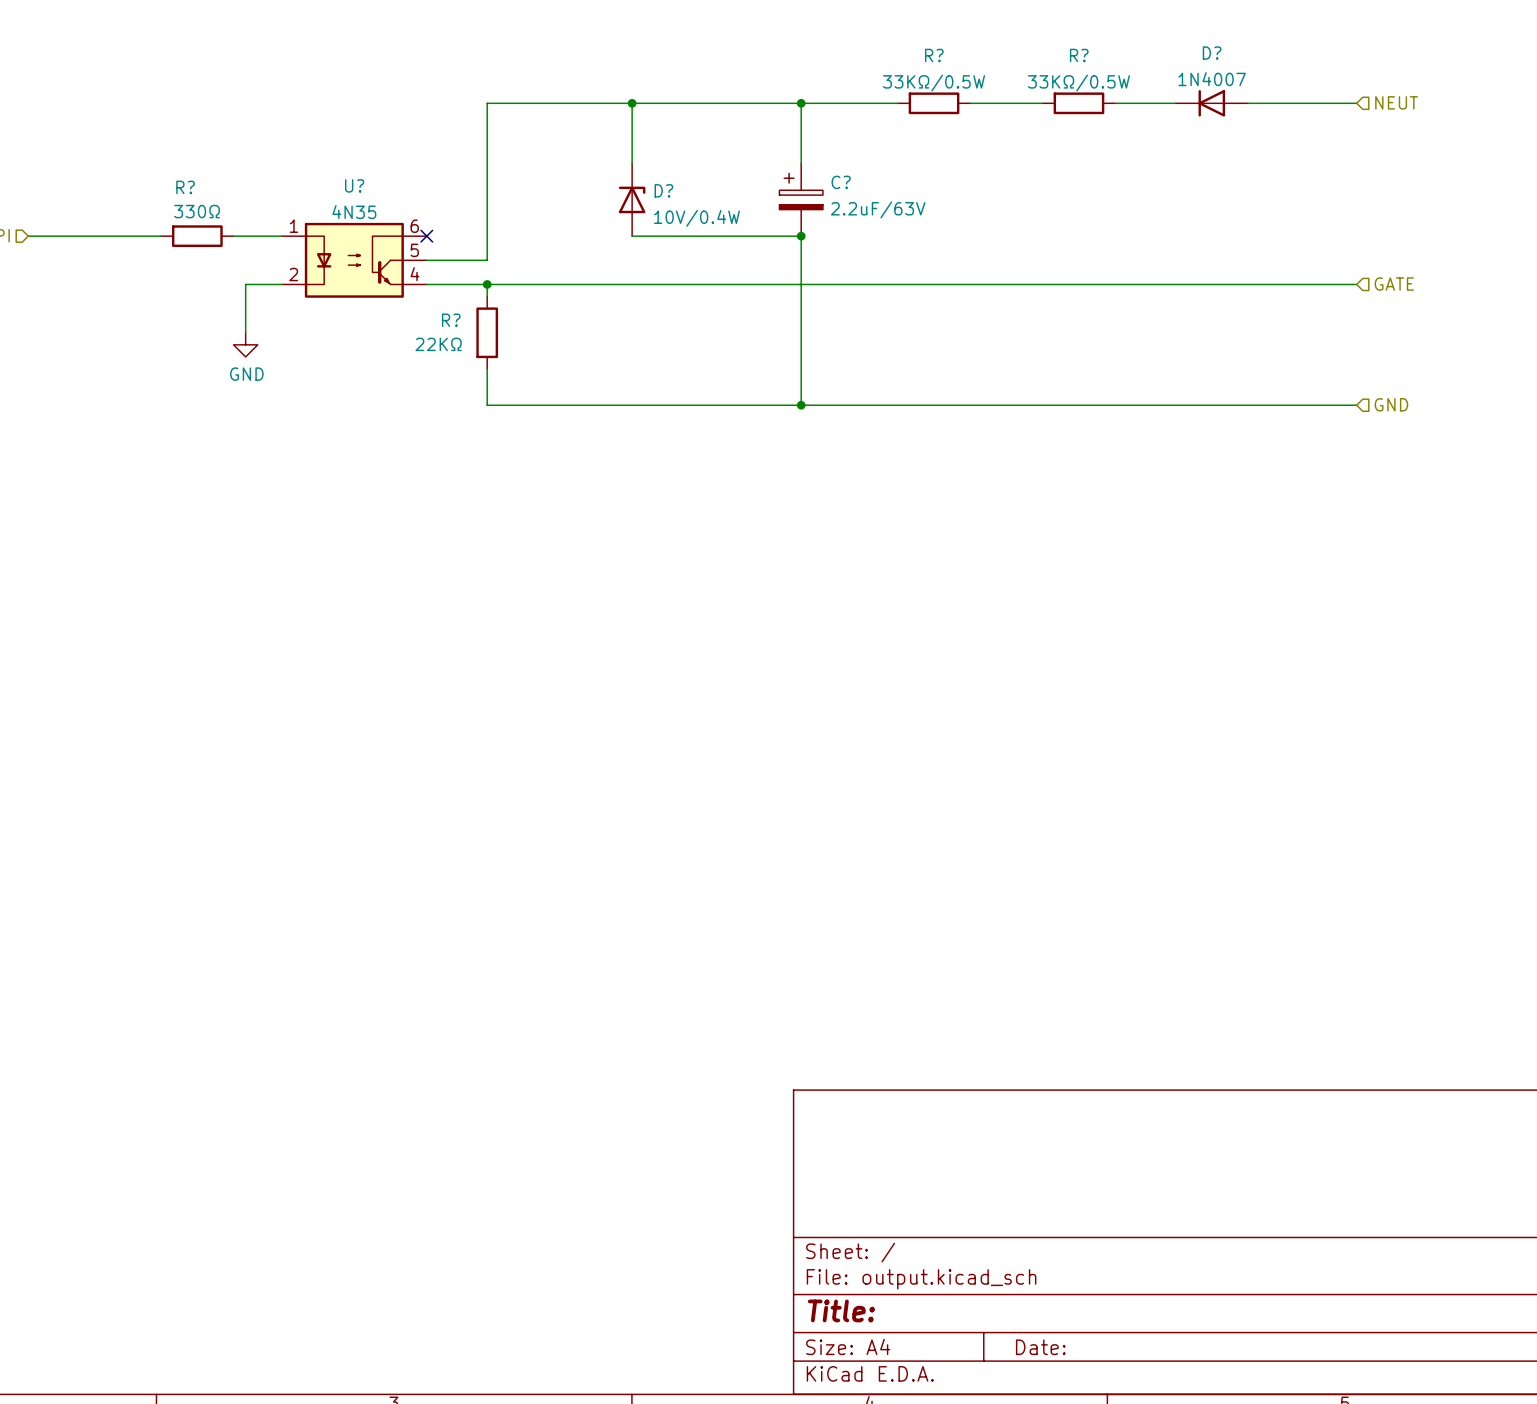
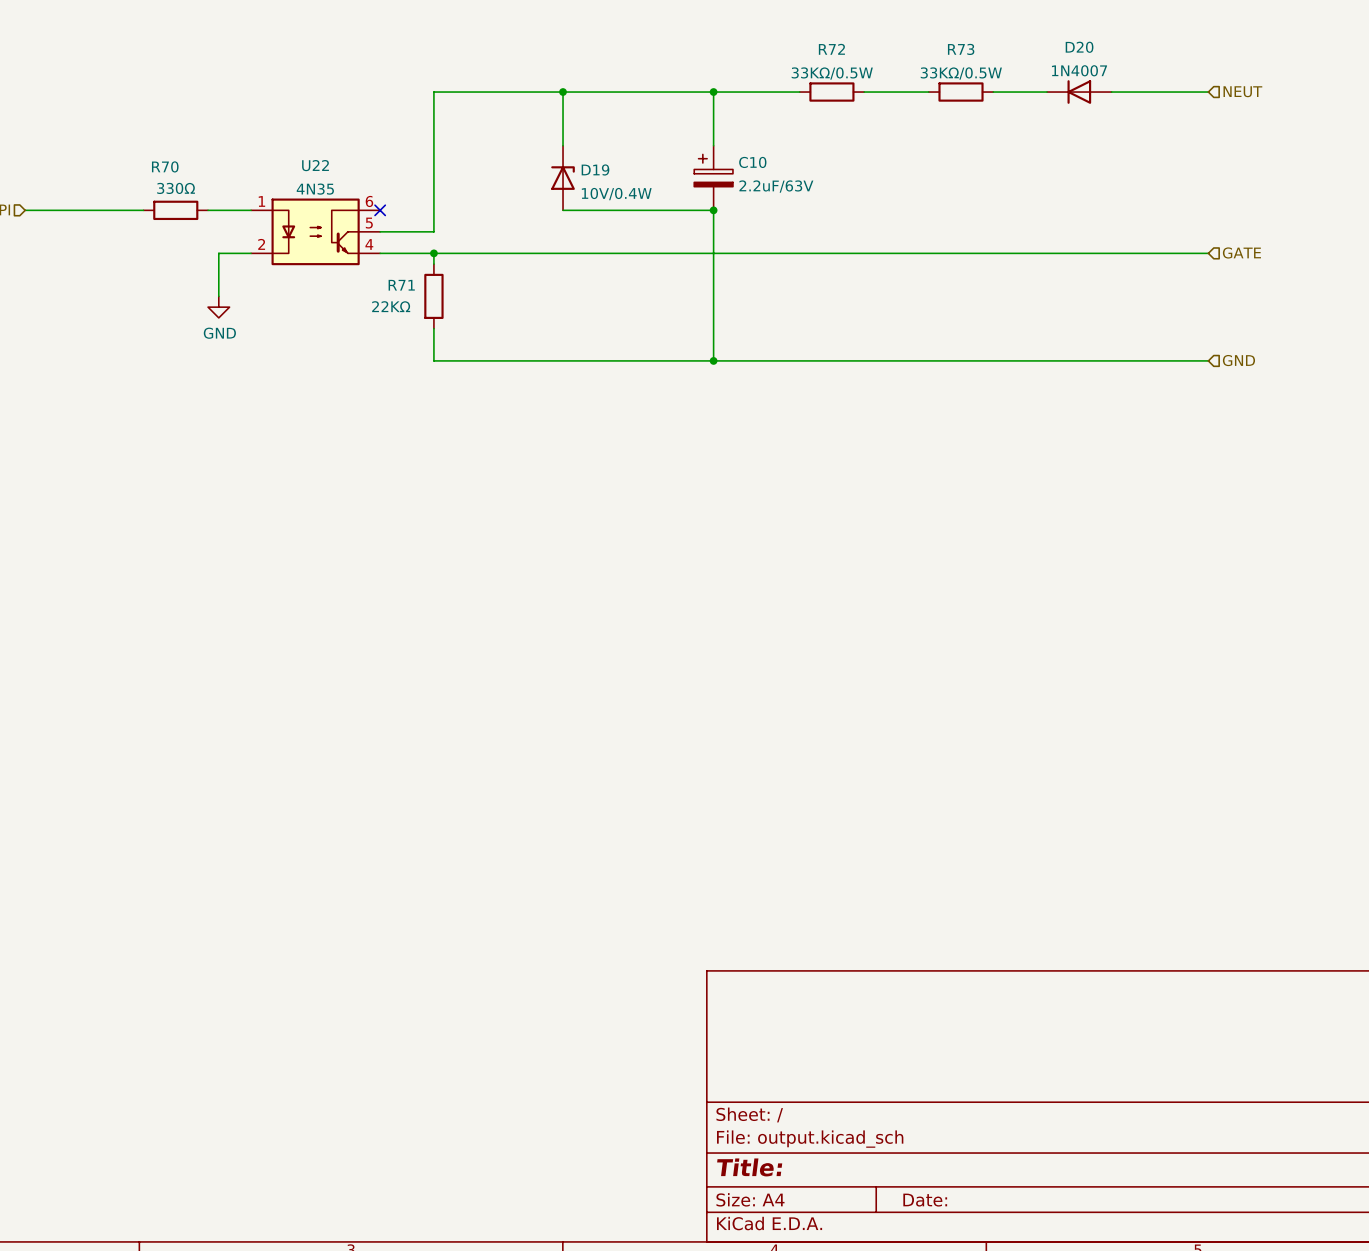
D? name: D? (1212, 53) -> D20 (1079, 47)
R? name: R? (934, 55) -> R72 (831, 49)
R? name: R? (1079, 55) -> R73 (961, 49)
C? name: C? (841, 182) -> C10 (752, 162)
U? name: U? (354, 185) -> U22 (315, 165)
R? name: R? (185, 187) -> R70 (165, 166)
D? name: D? (663, 190) -> D19 (595, 169)
R? name: R? (451, 320) -> R71 (401, 285)

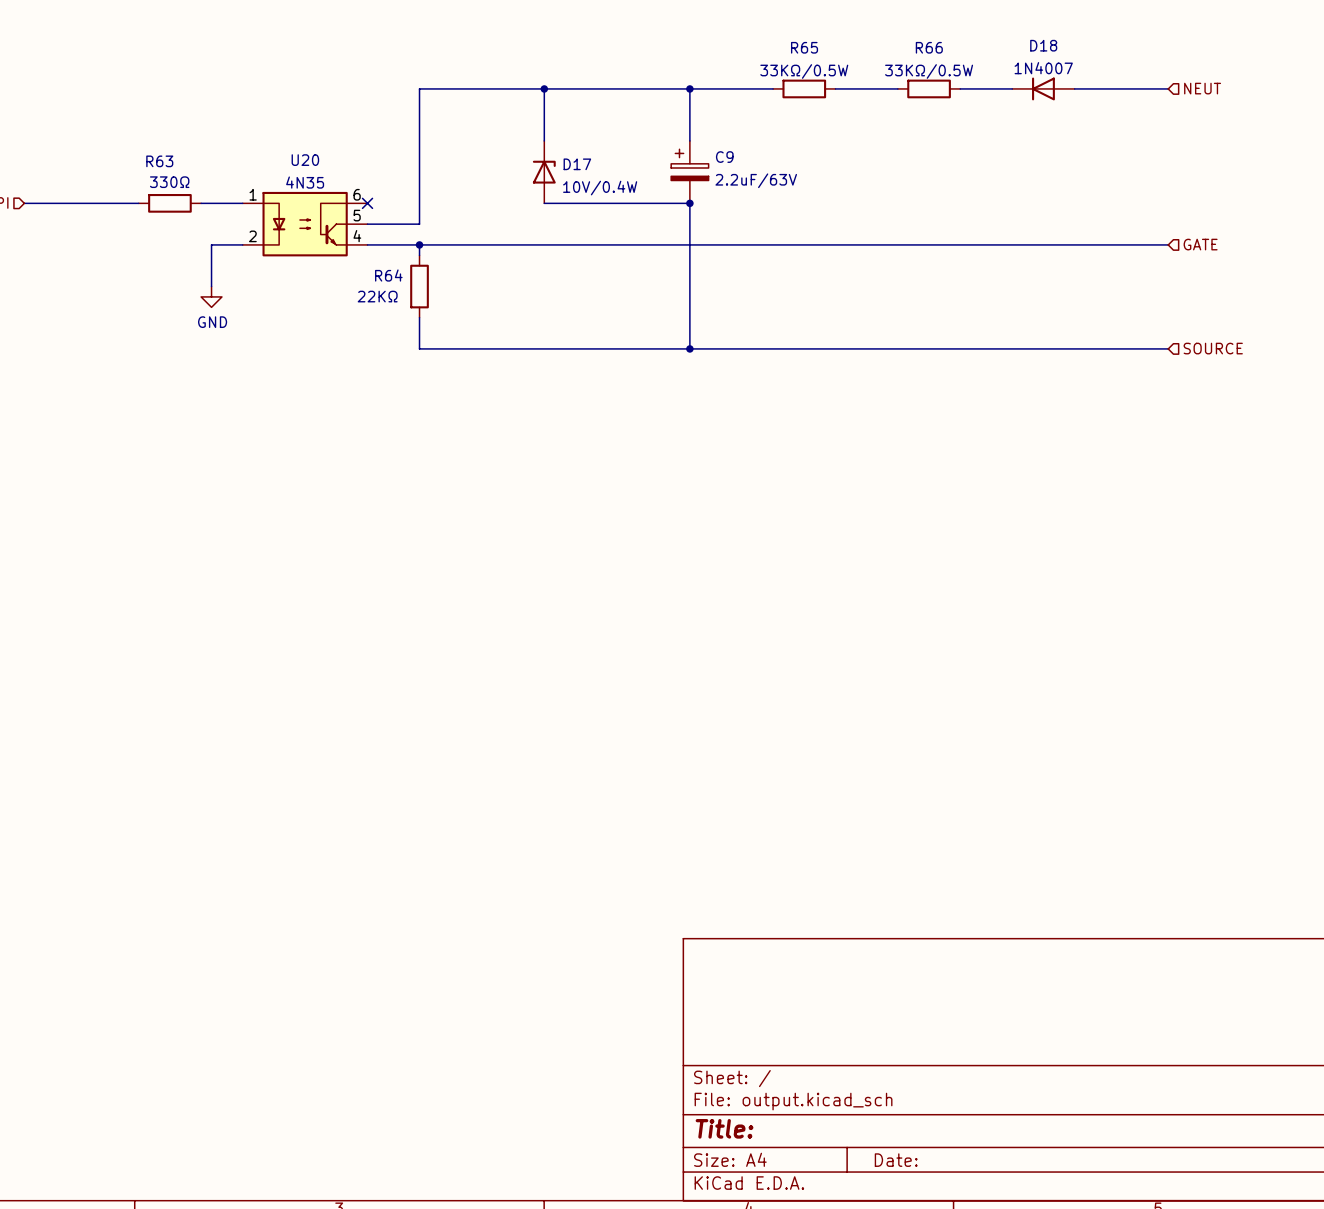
D20 name: D20 (1079, 47) -> D18 (1043, 45)
R72 name: R72 (831, 49) -> R65 (804, 47)
R73 name: R73 (961, 49) -> R66 (929, 47)
C10 name: C10 (752, 162) -> C9 (724, 157)
U22 name: U22 (315, 165) -> U20 (305, 160)
R70 name: R70 (165, 166) -> R63 (159, 161)
D19 name: D19 (595, 169) -> D17 (577, 164)
R71 name: R71 (401, 285) -> R64 (388, 275)
hierarchical label: GND (1238, 360) -> SOURCE (1213, 348)

